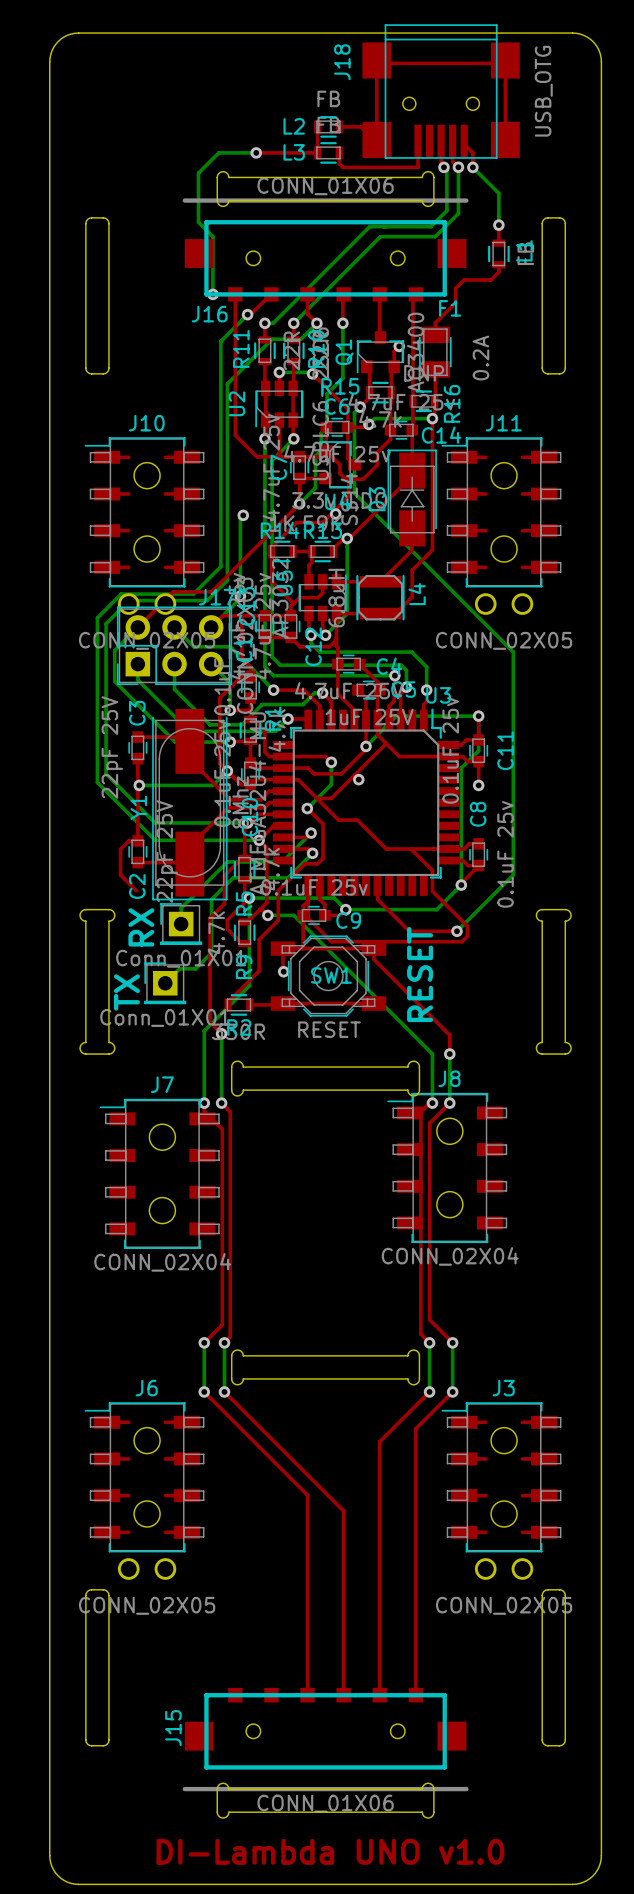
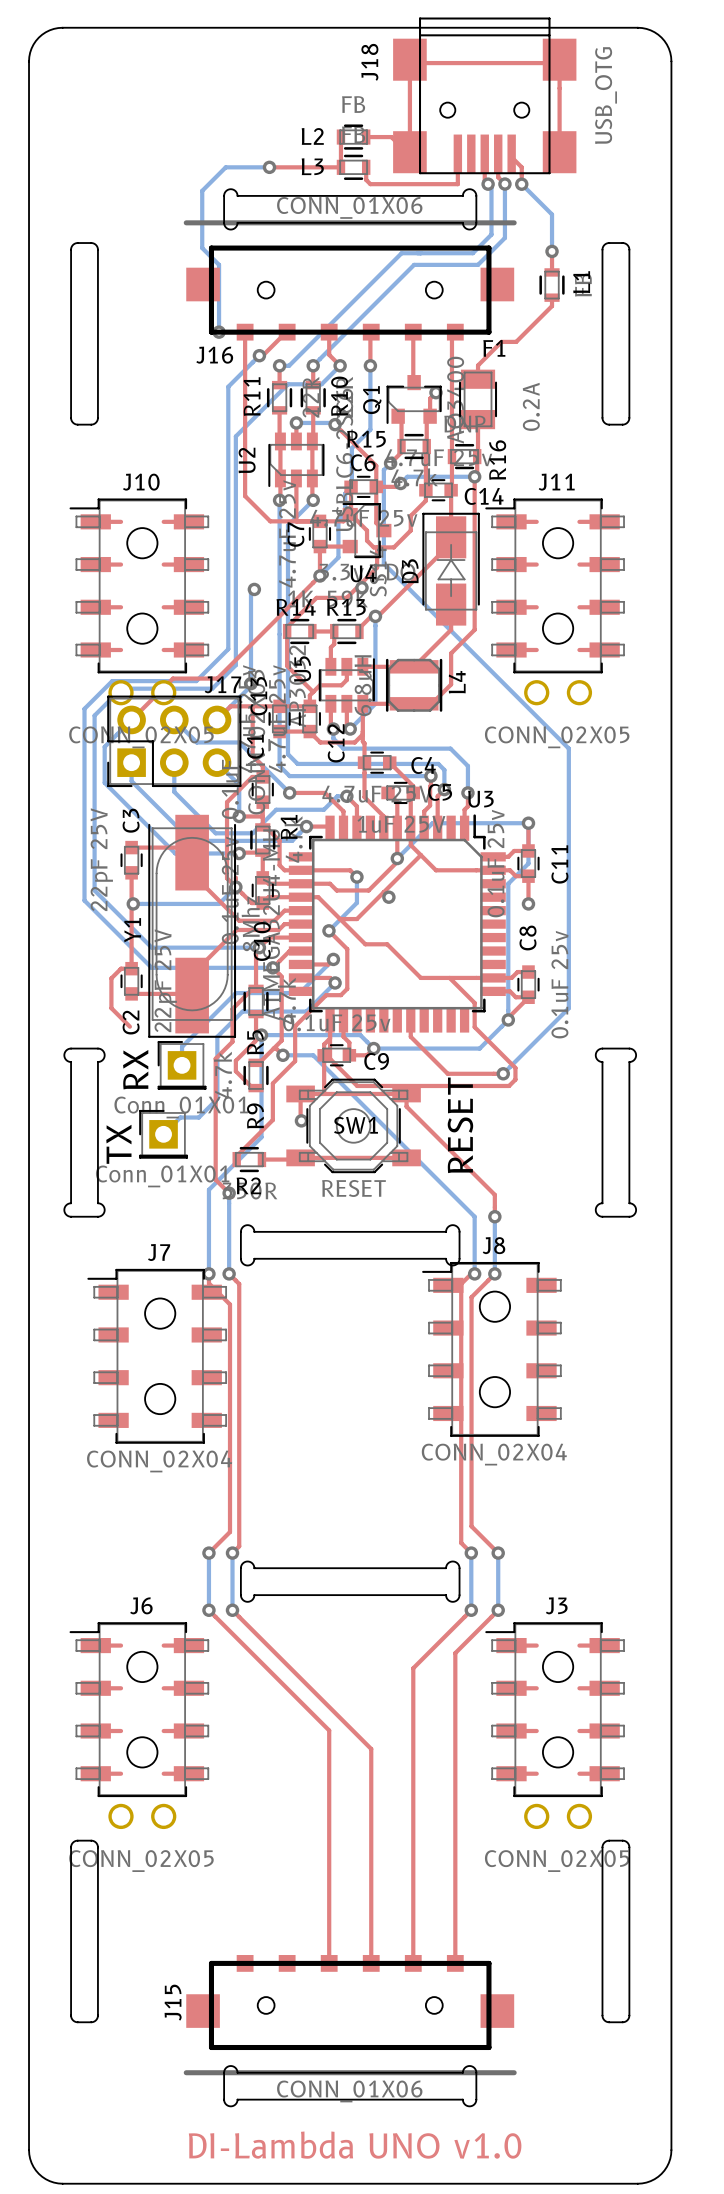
top track: (490, 279) (464, 279) (455, 288) (455, 302) -> (542, 315) (516, 341) (501, 341)

